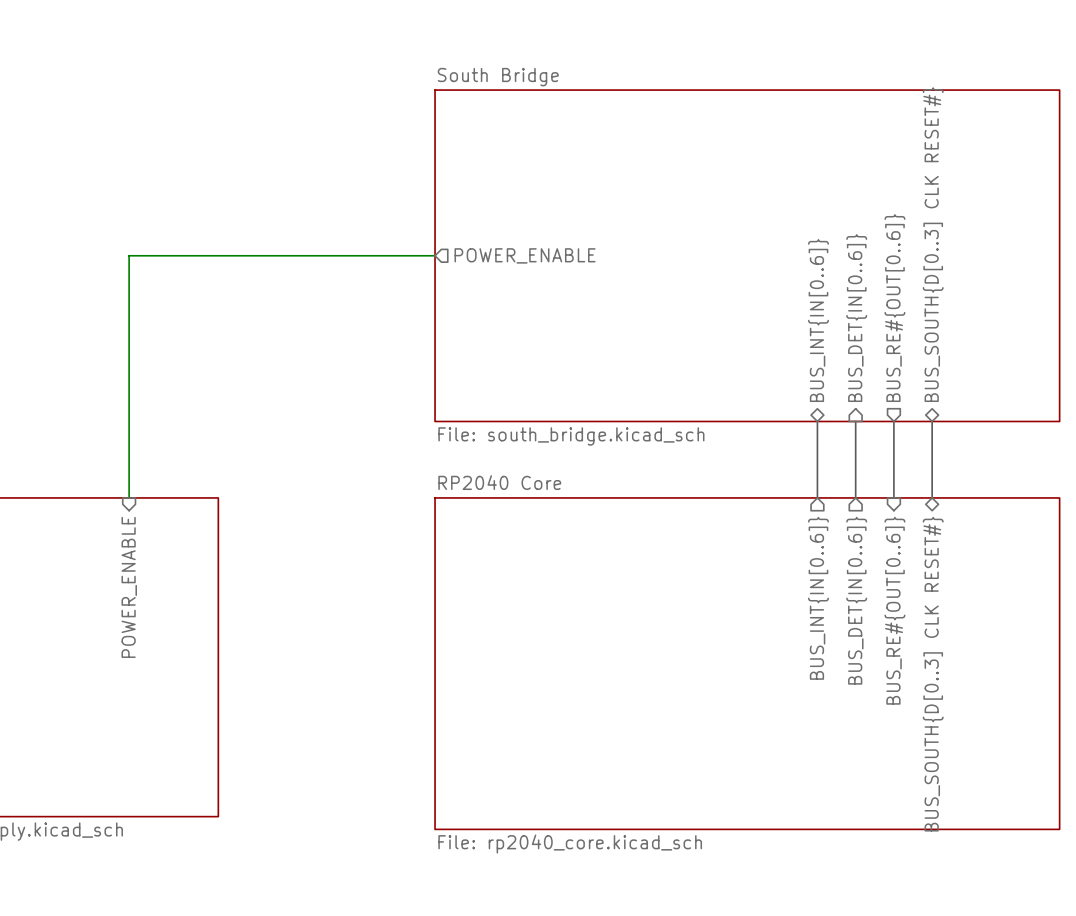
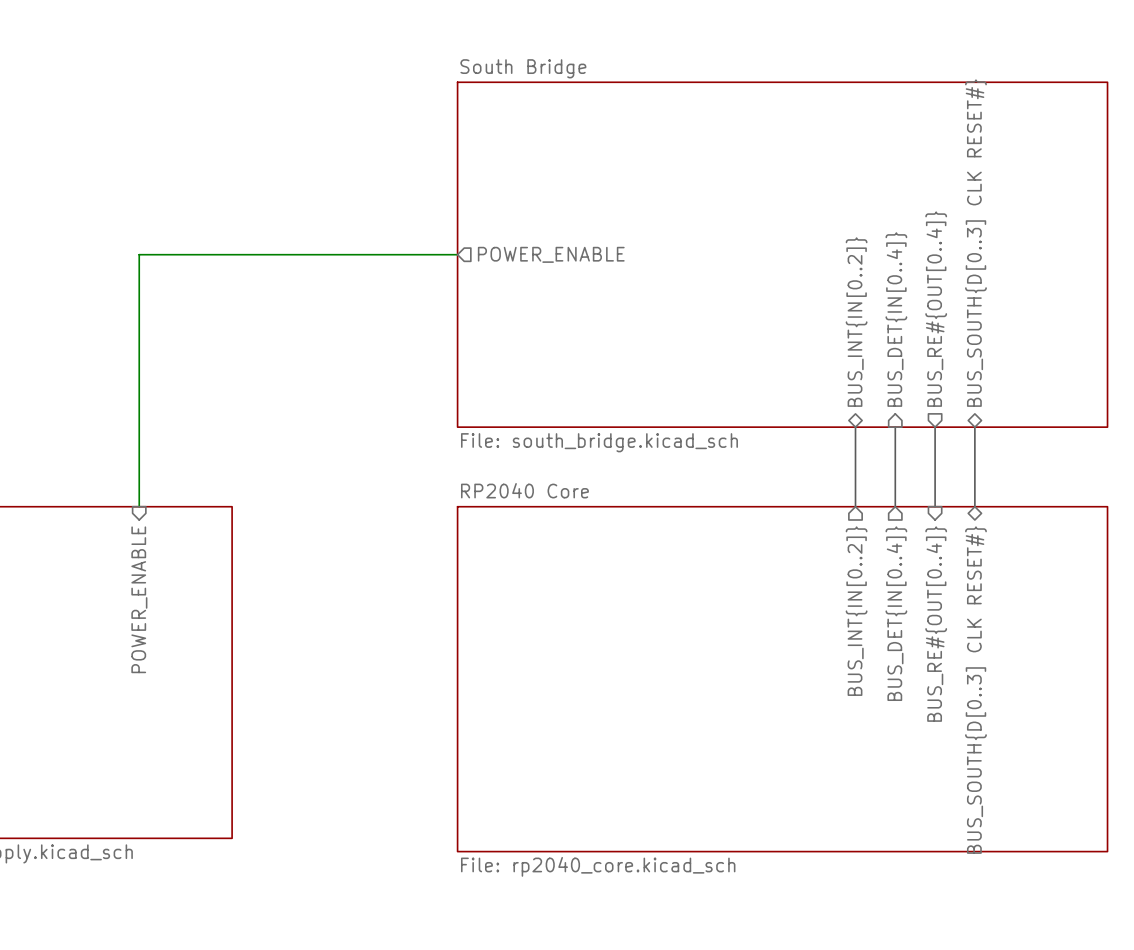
sheet pin: BUS_RE#{OUT[0..6]} (894, 308) -> BUS_RE#{OUT[0..4]} (936, 309)
sheet pin: BUS_DET{IN[0..6]} (856, 318) -> BUS_DET{IN[0..4]} (896, 319)
sheet pin: BUS_INT{IN[0..6]} (818, 320) -> BUS_INT{IN[0..2]} (856, 322)
sheet pin: BUS_INT{IN[0..6]} (818, 598) -> BUS_INT{IN[0..2]} (856, 611)
sheet pin: BUS_DET{IN[0..6]} (856, 600) -> BUS_DET{IN[0..4]} (896, 613)
sheet pin: BUS_RE#{OUT[0..6]} (894, 610) -> BUS_RE#{OUT[0..4]} (936, 624)

